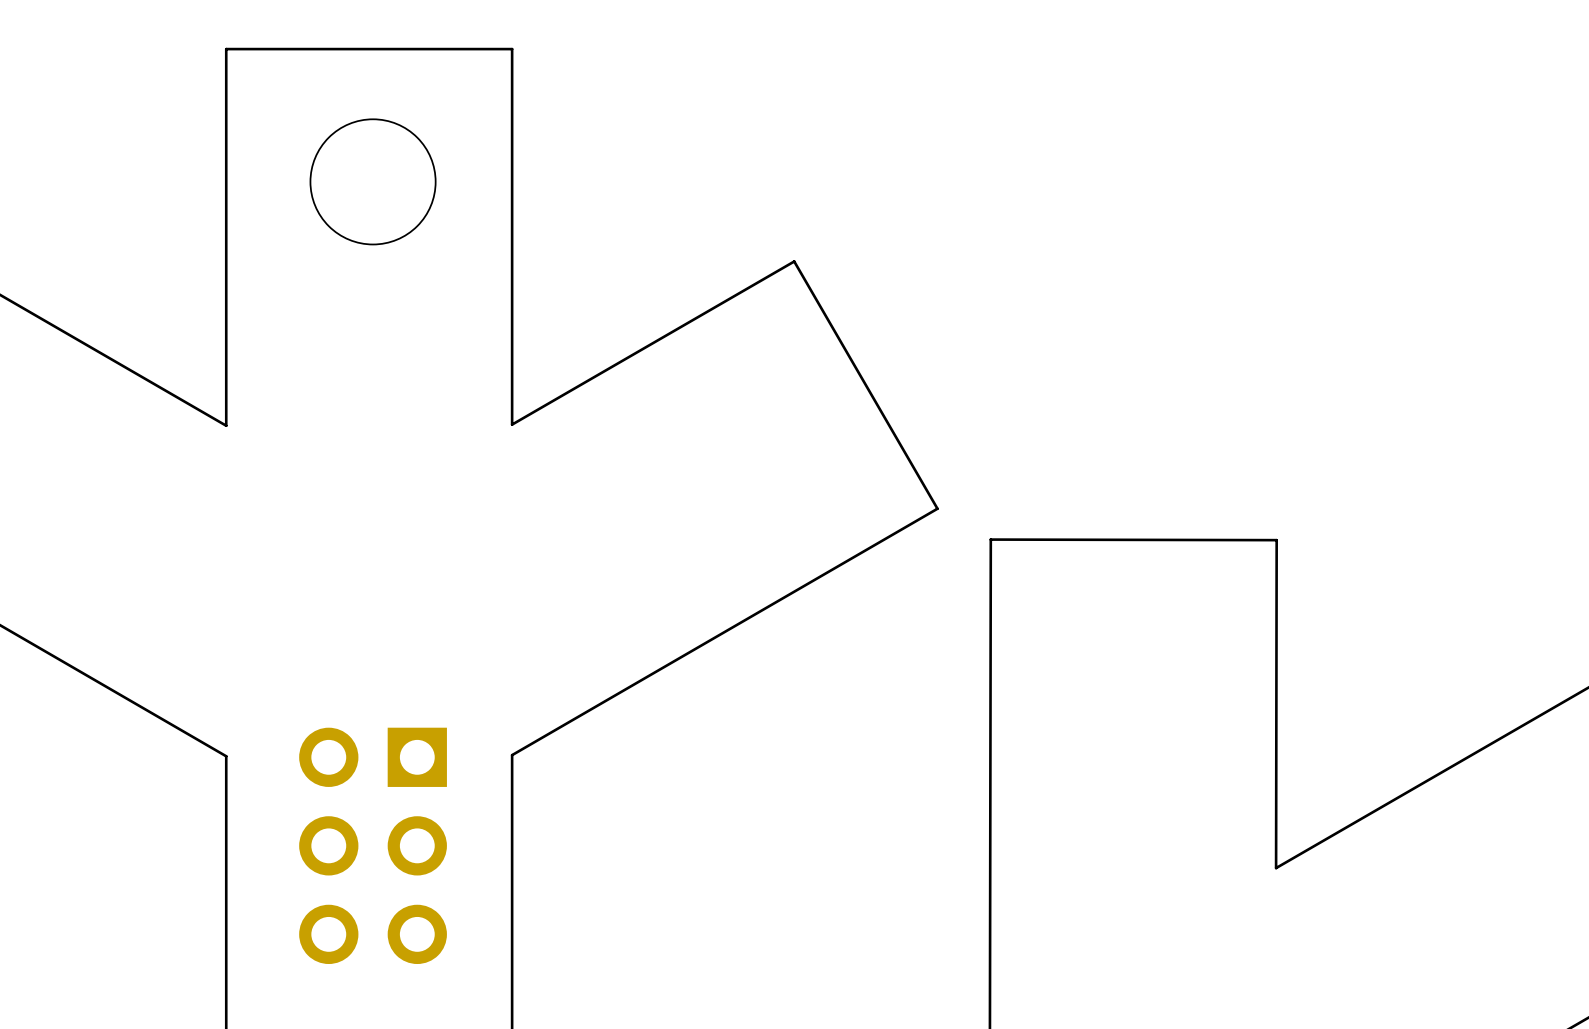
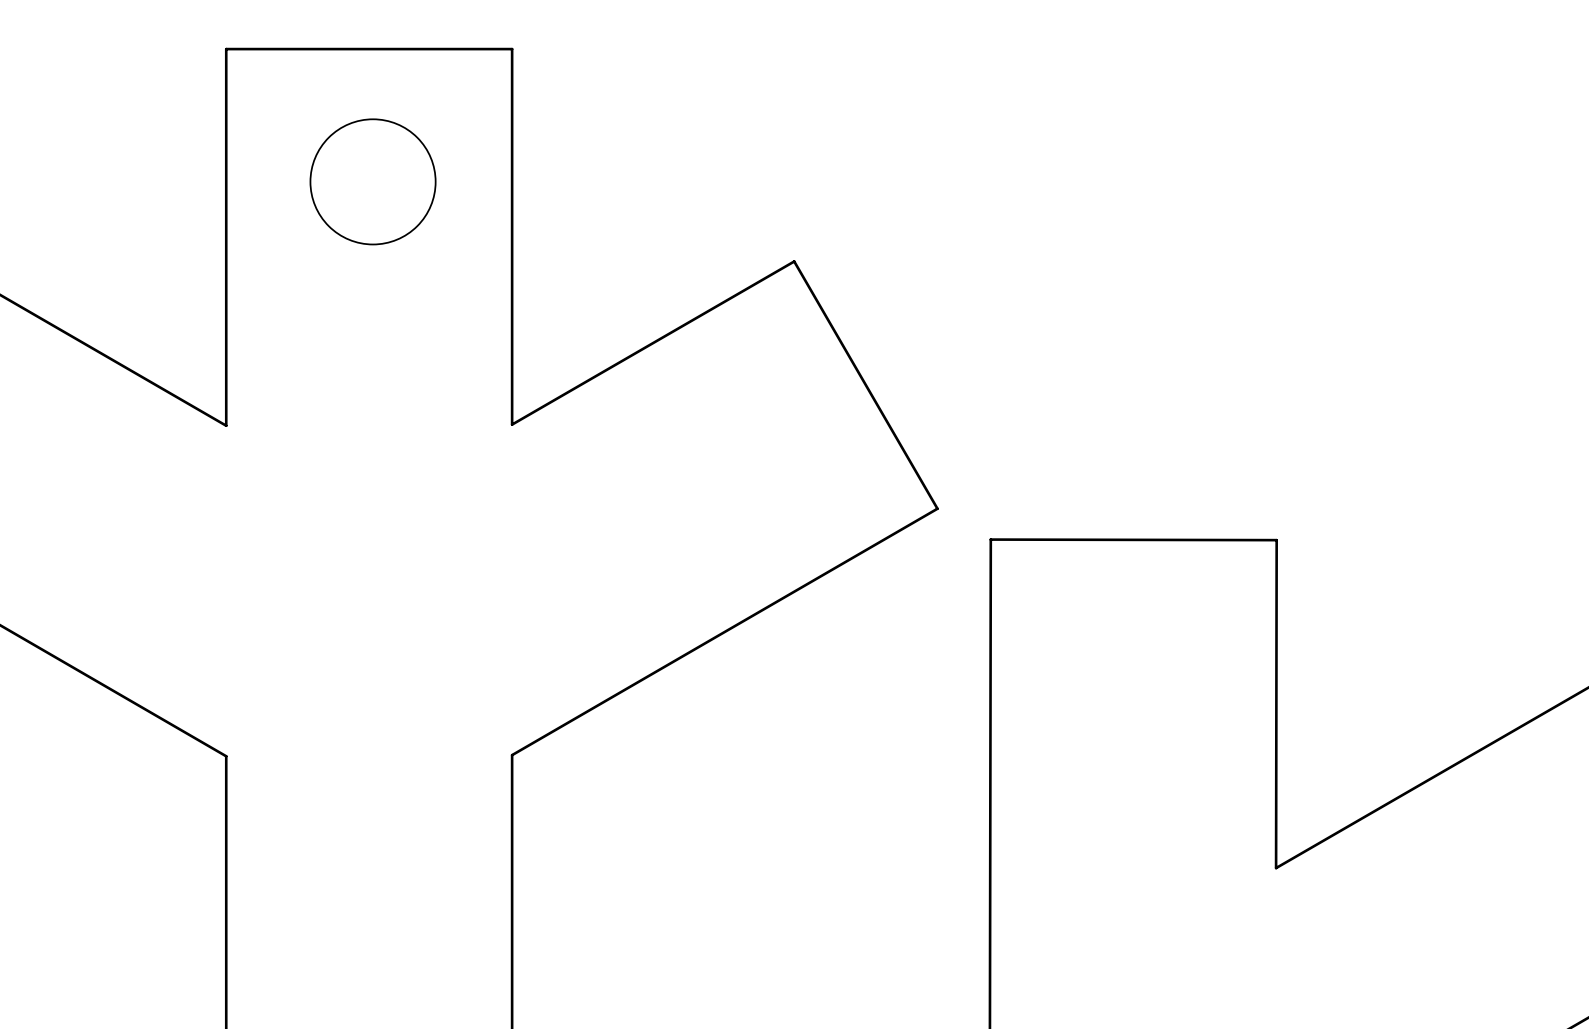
part: (373, 845) -> none

